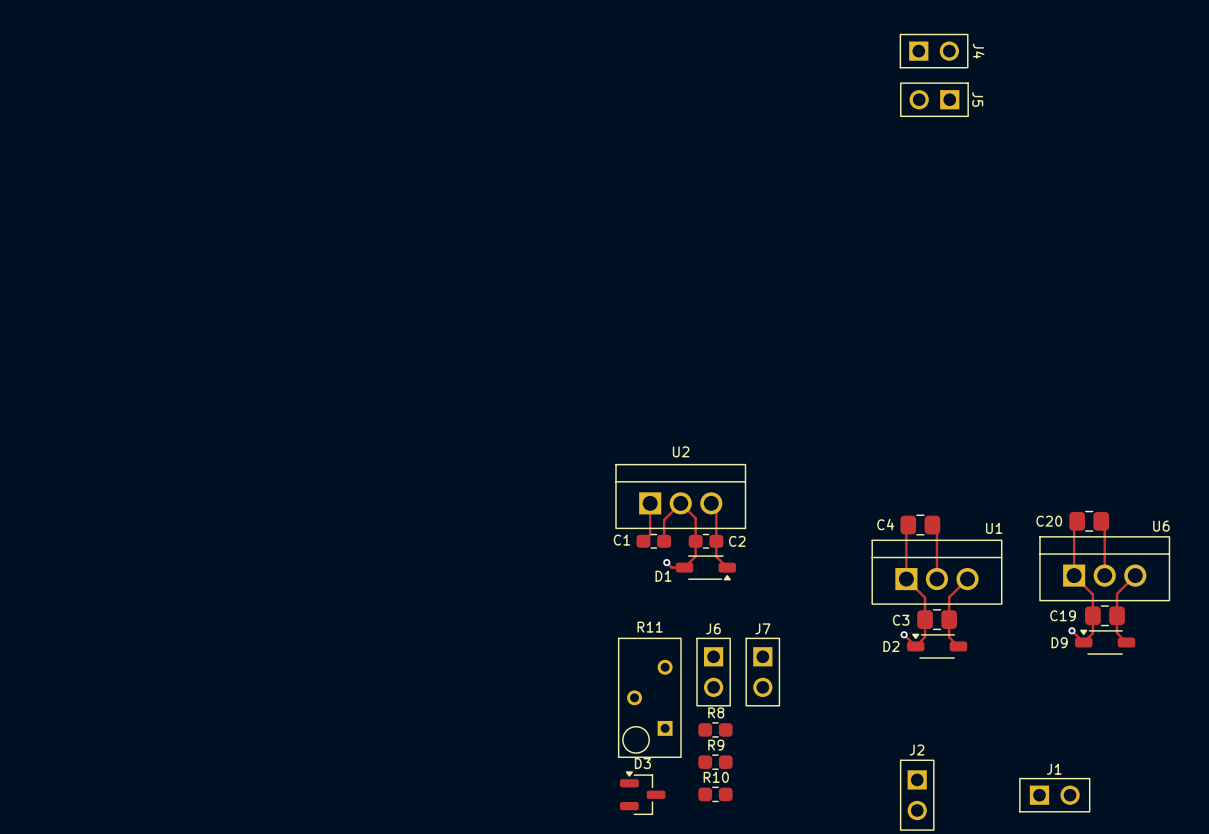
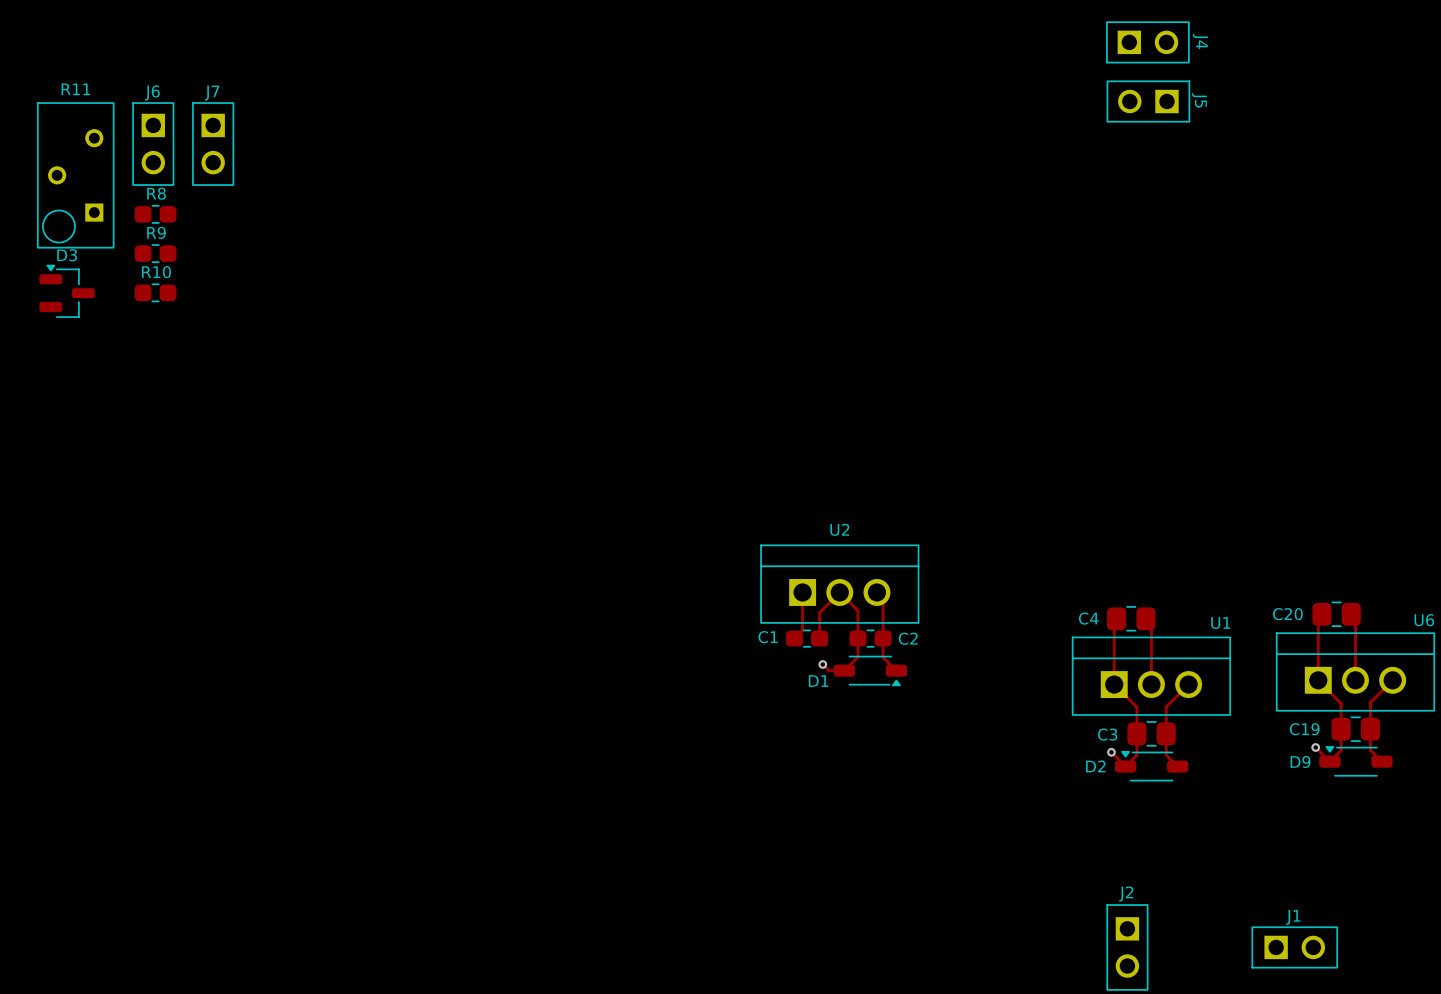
J6 position: (713, 672) -> (153, 144)
J7 position: (762, 672) -> (213, 144)
R11 position: (649, 697) -> (75, 175)
R8 position: (715, 729) -> (155, 214)
R9 position: (715, 762) -> (155, 253)
D3 position: (642, 793) -> (67, 291)
R10 position: (715, 794) -> (155, 292)

